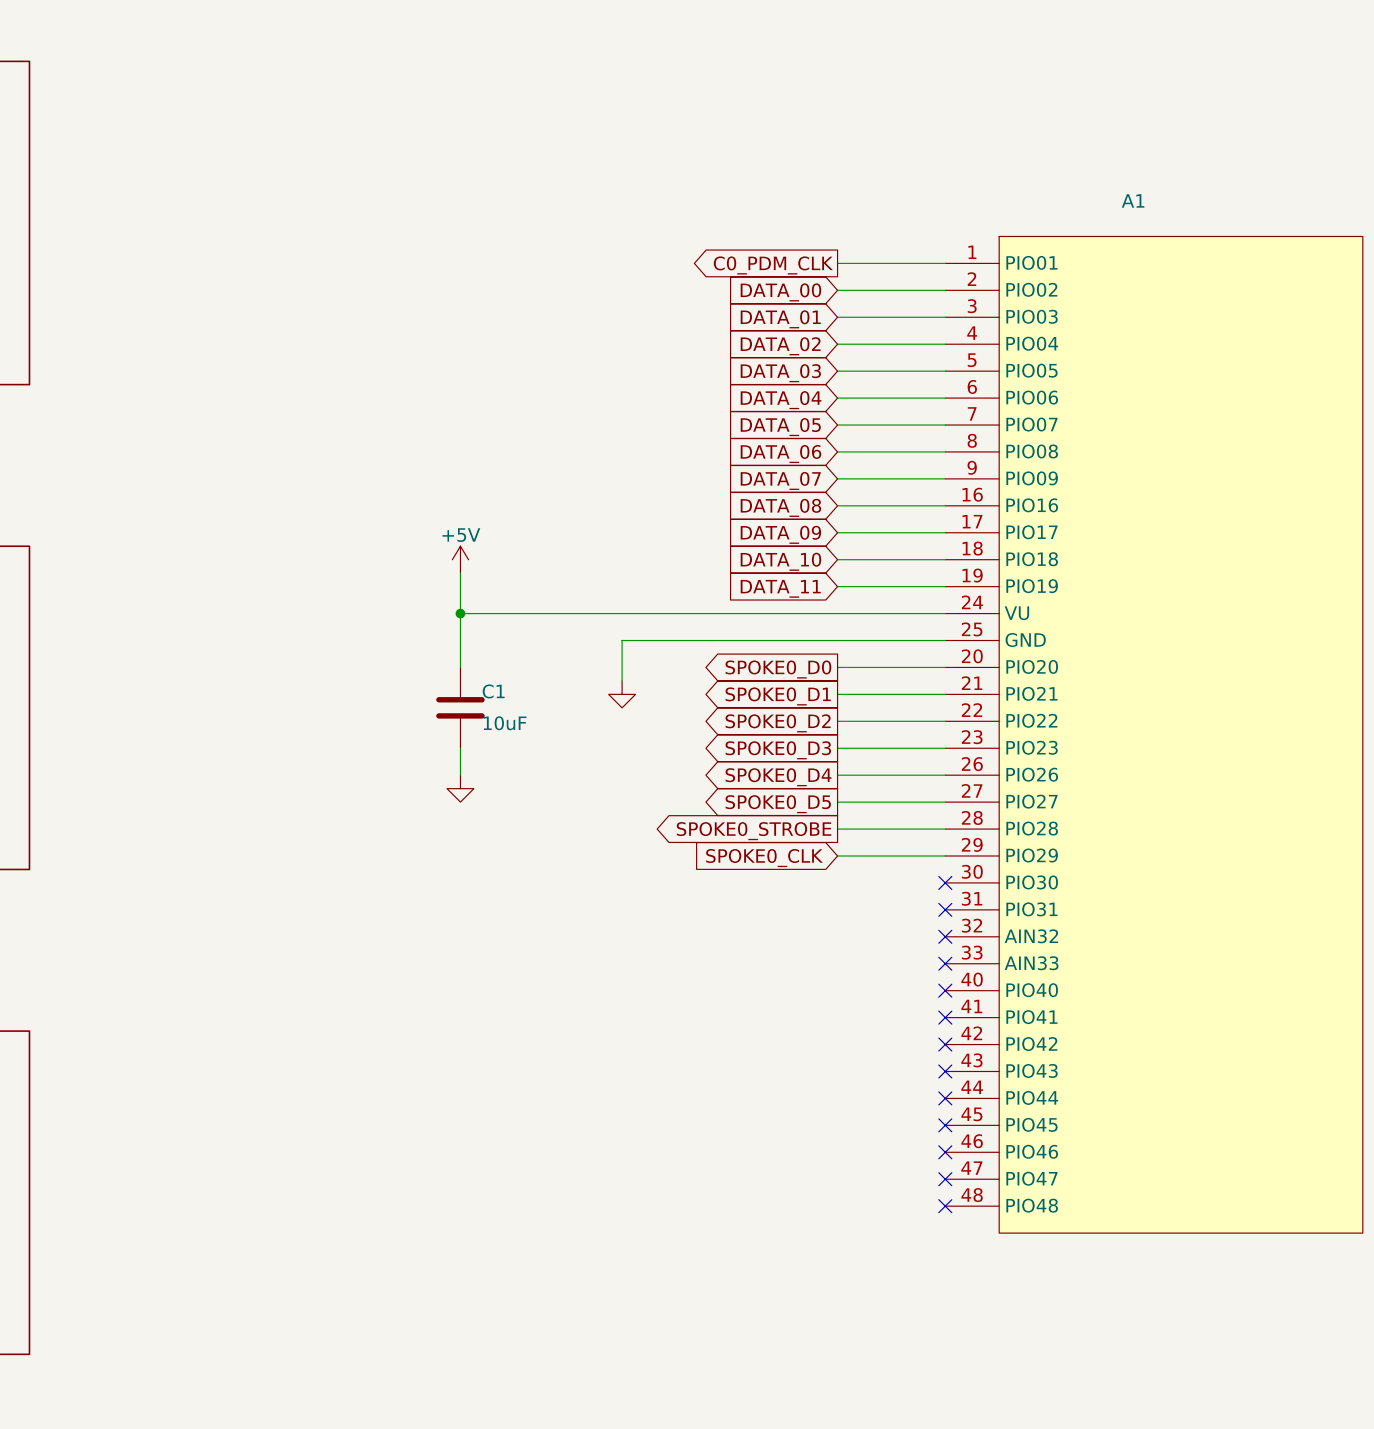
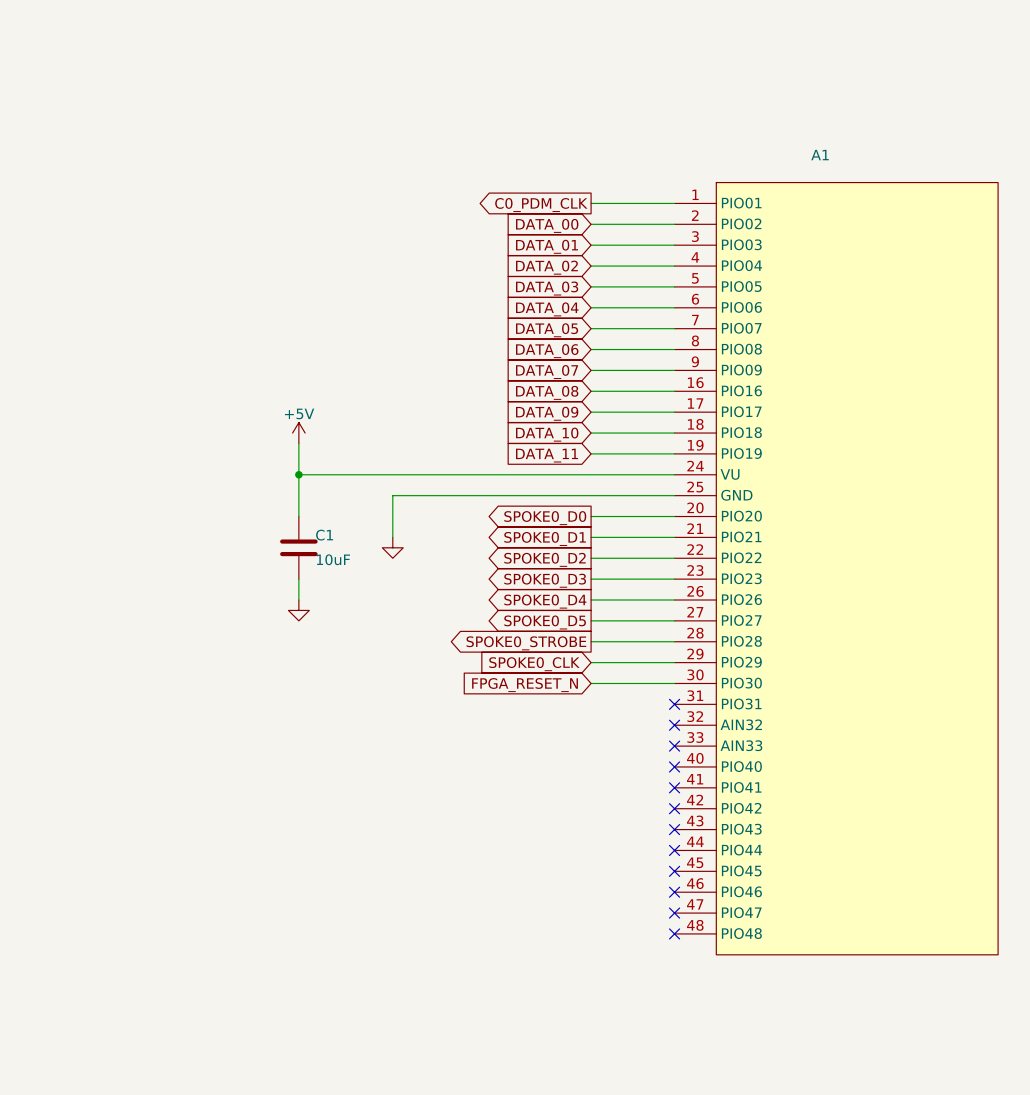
wire: (622, 640) (622, 680) -> (424, 495) (392, 495) (392, 537)
power symbol position: (622, 694) -> (392, 547)
wire: none -> (591, 683) (674, 683)
no-connect mark: (945, 882) -> none
global label: none -> FPGA_RESET_N (525, 685)

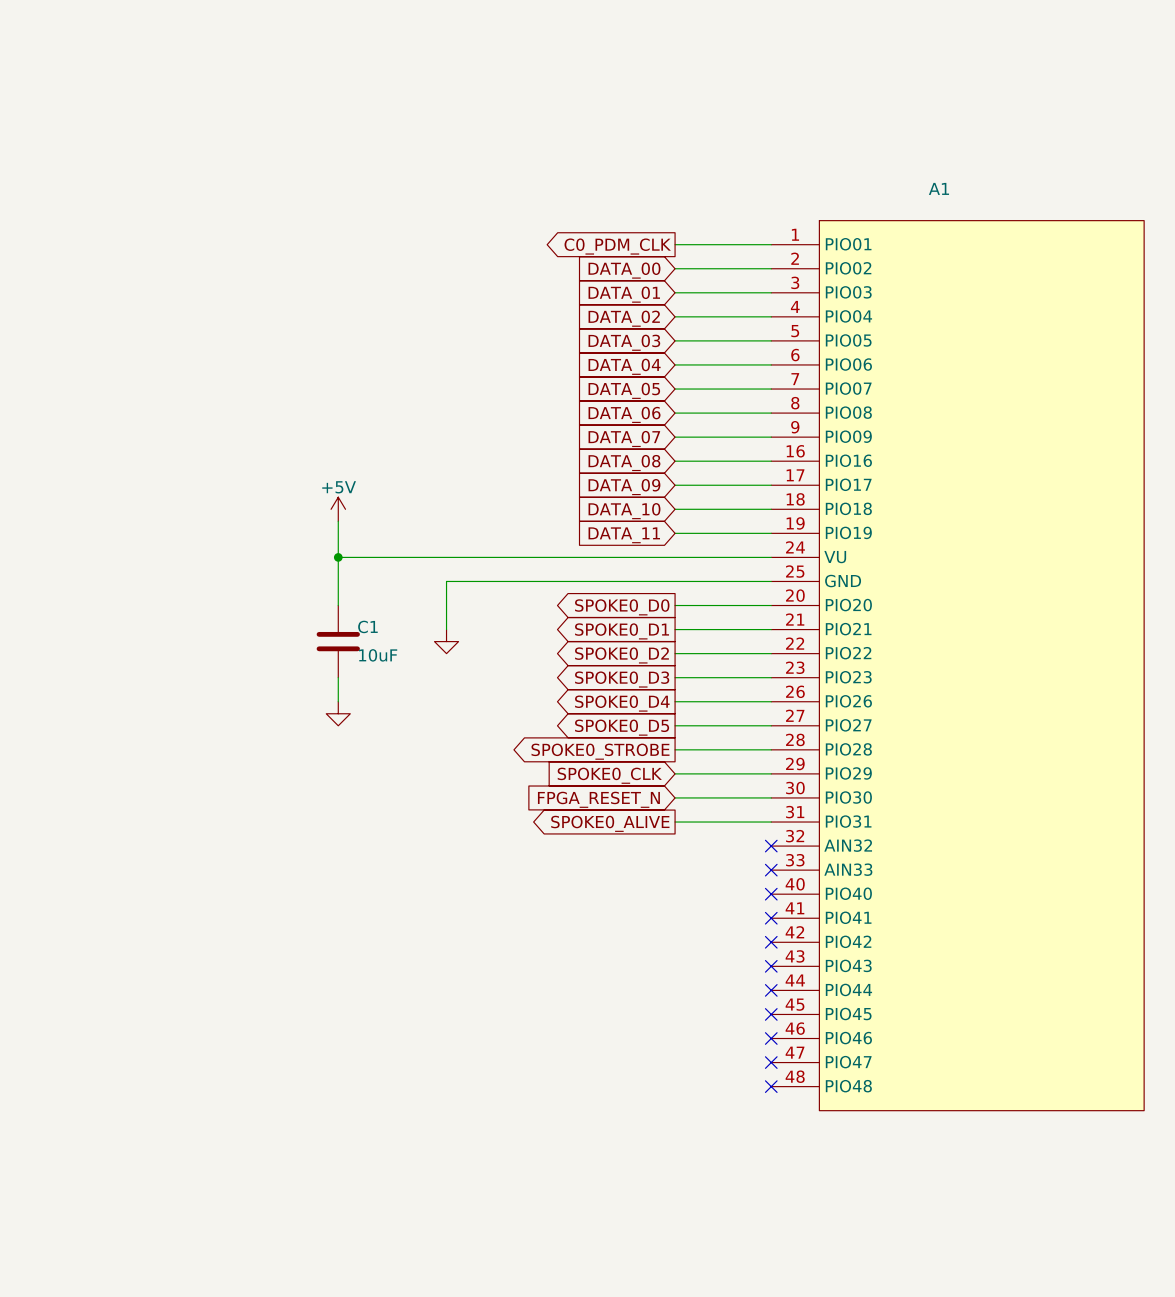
wire: none -> (675, 822) (771, 822)
no-connect mark: (674, 704) -> none
global label: none -> SPOKE0_ALIVE (610, 823)

